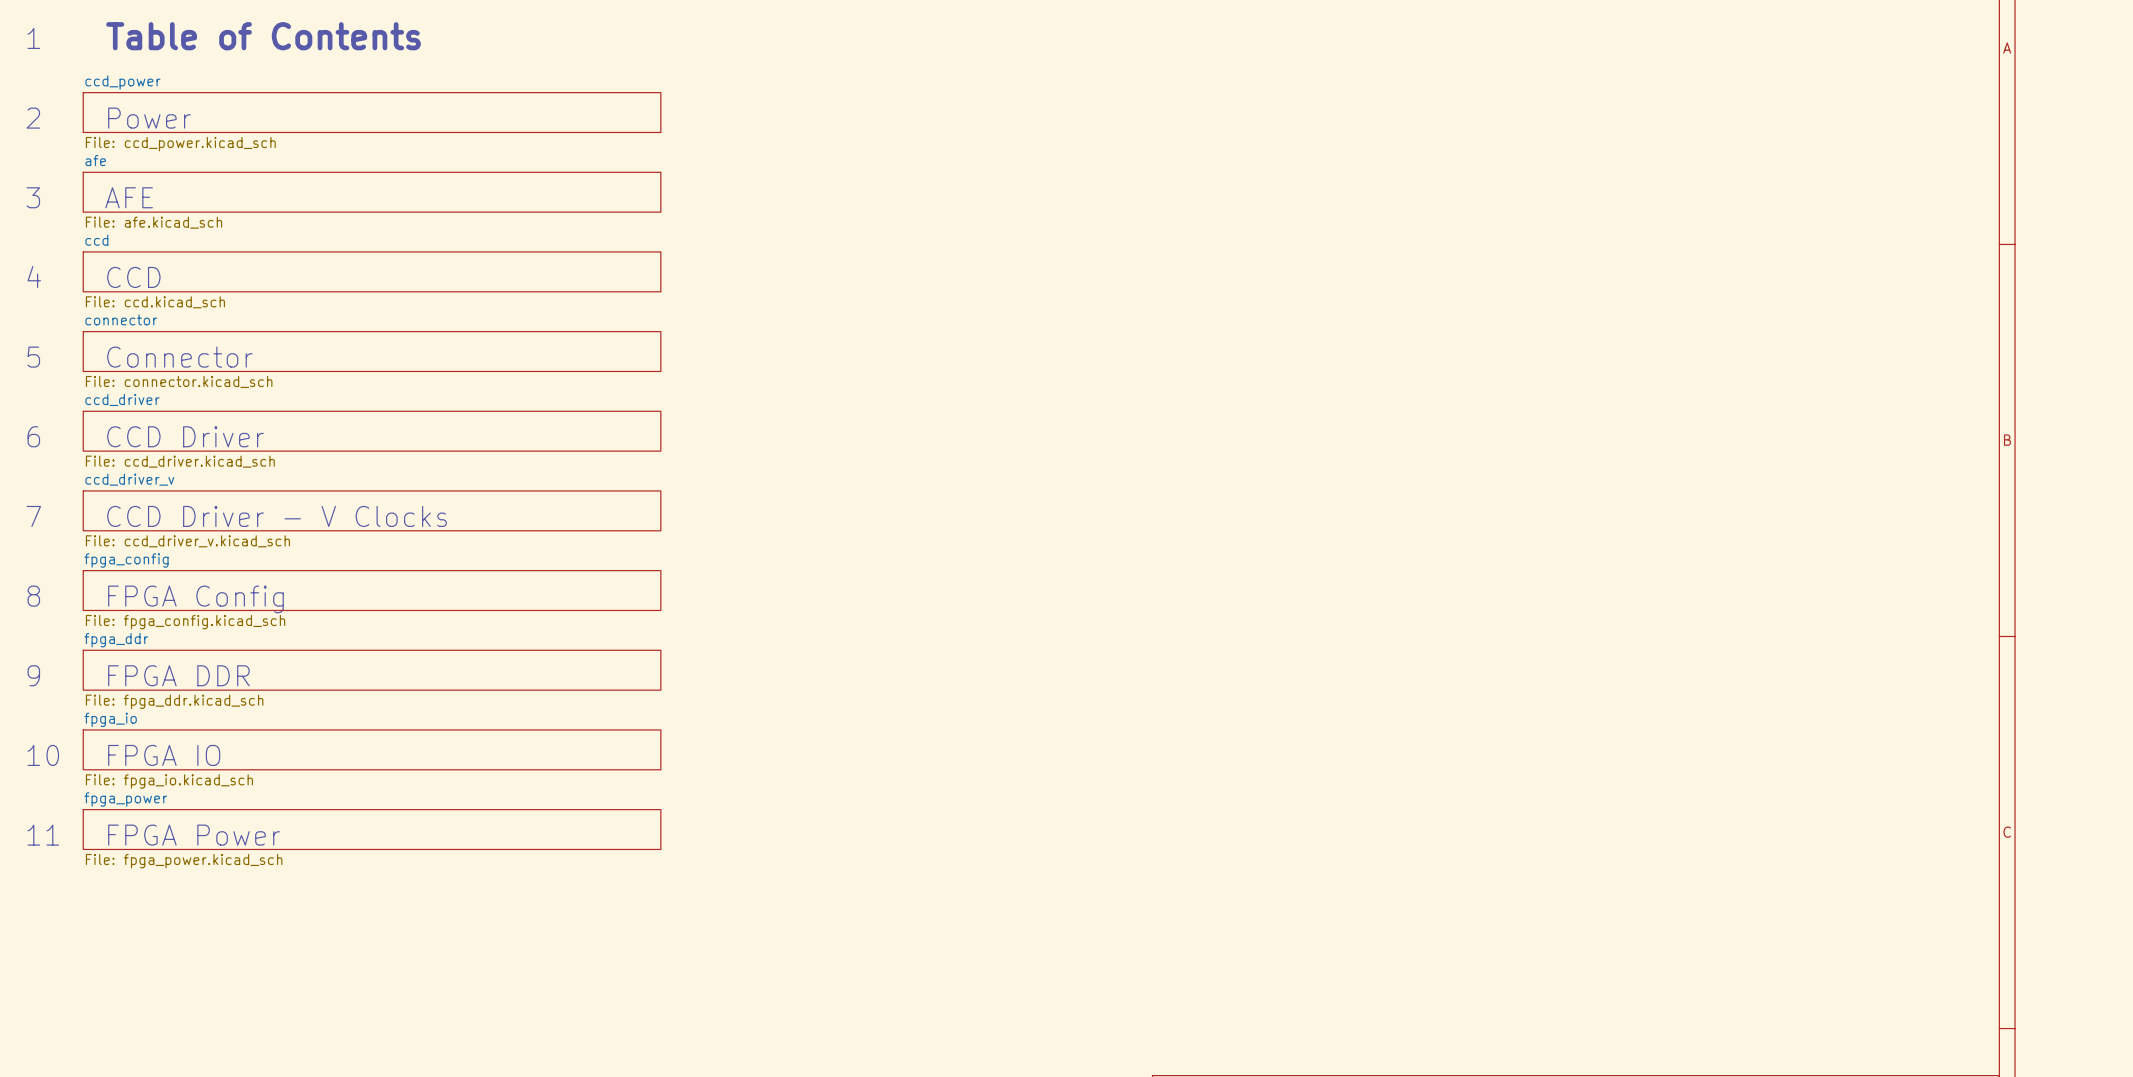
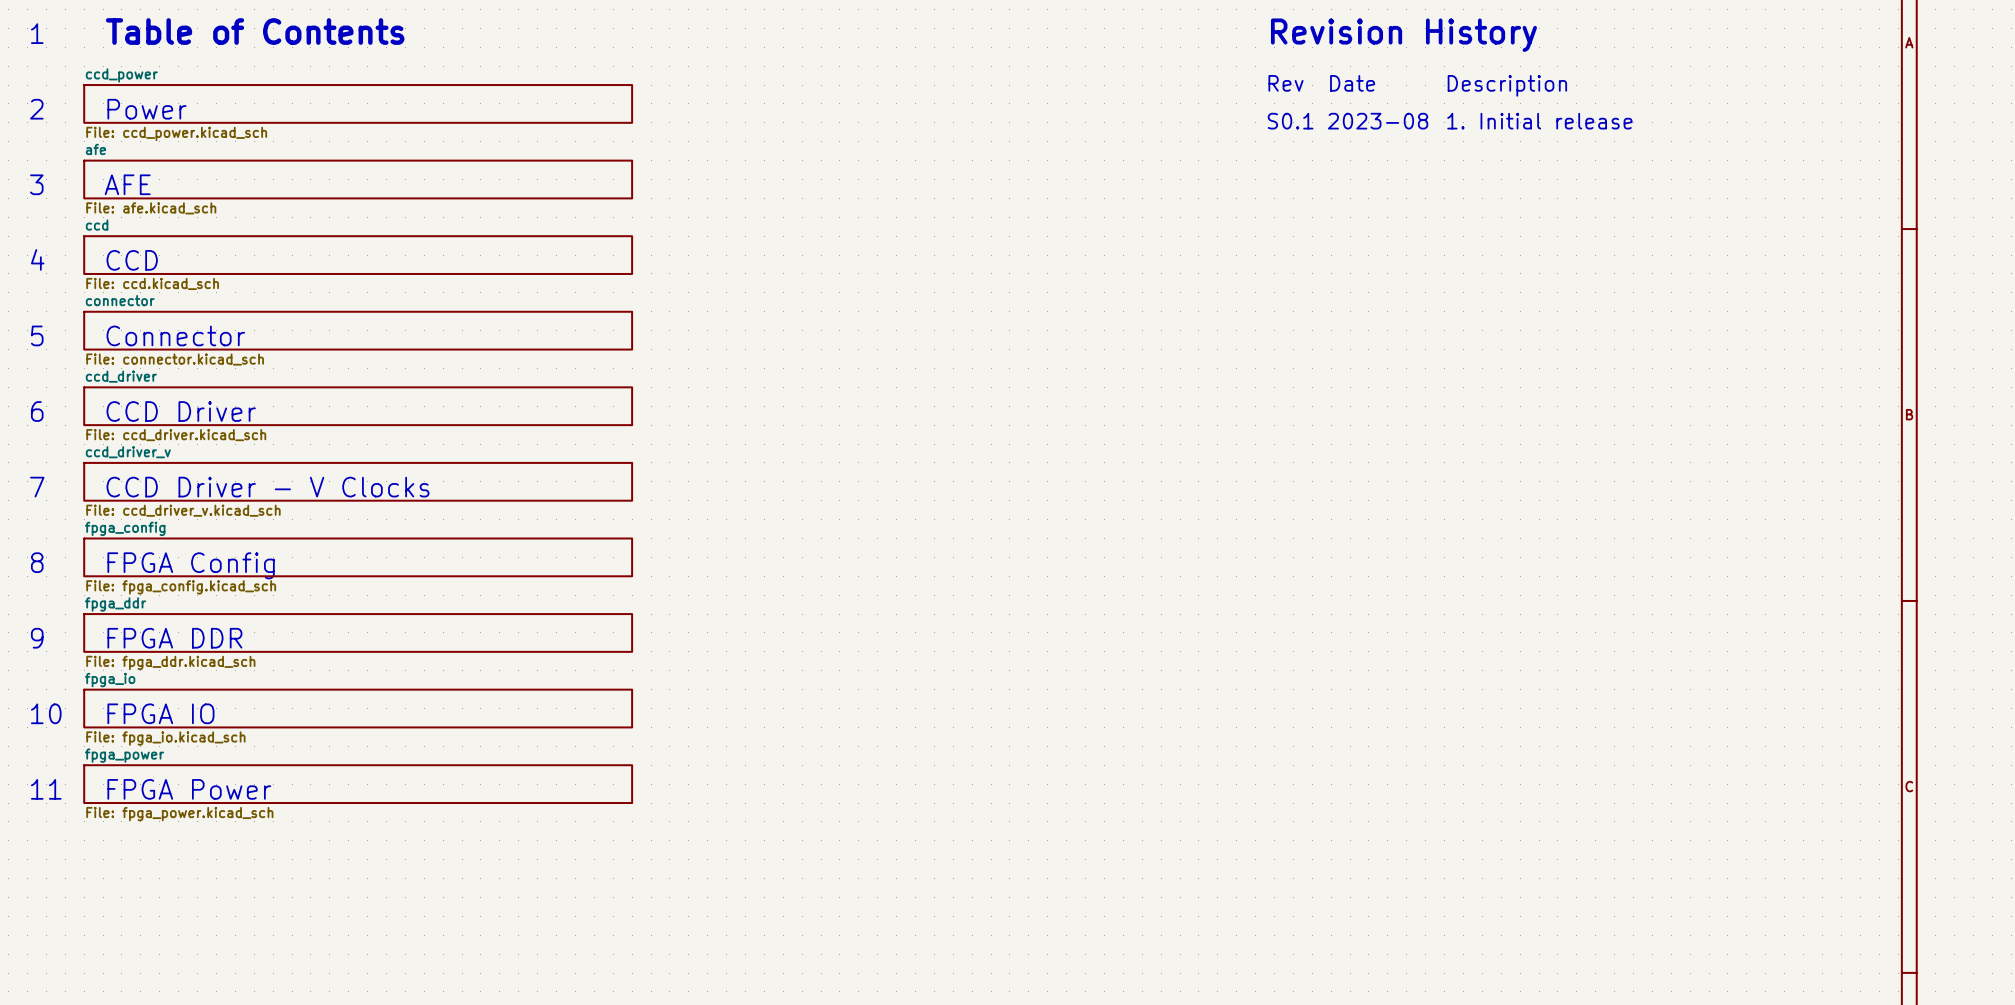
text: none -> Revision History (1403, 35)
text: none -> Rev Date Description (1417, 85)
text: none -> S0.1 2023-08 (1347, 121)
text: none -> 1. Initial release (1539, 121)

